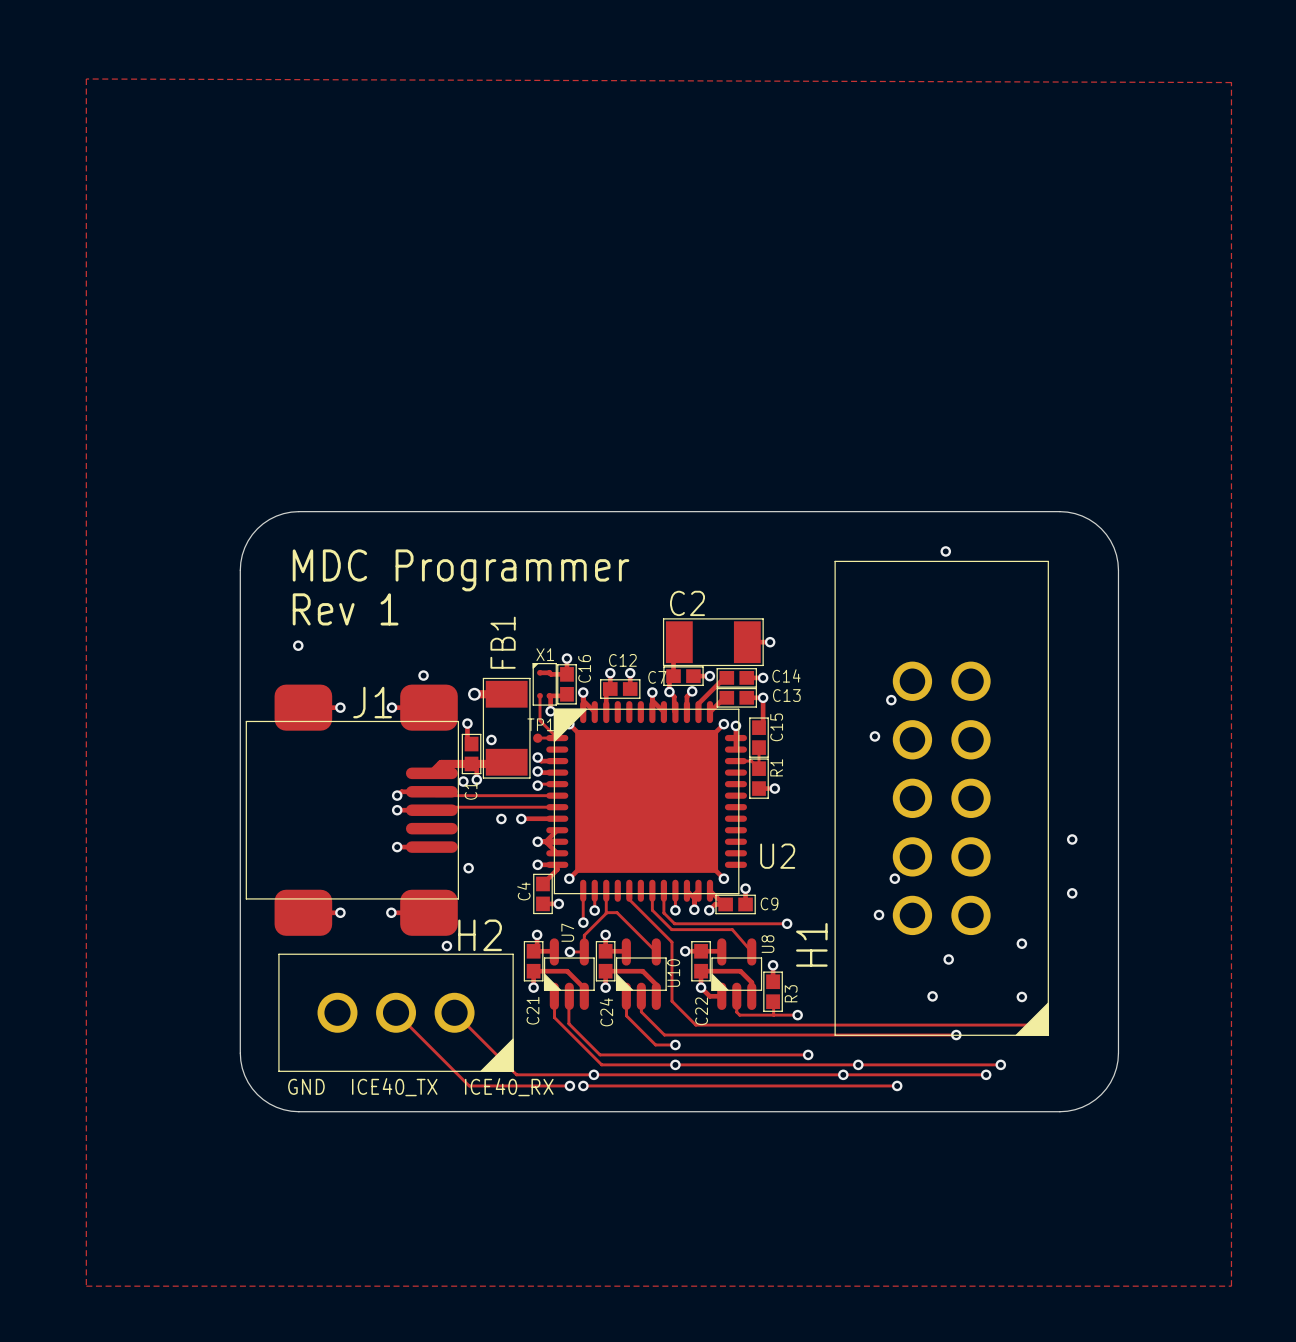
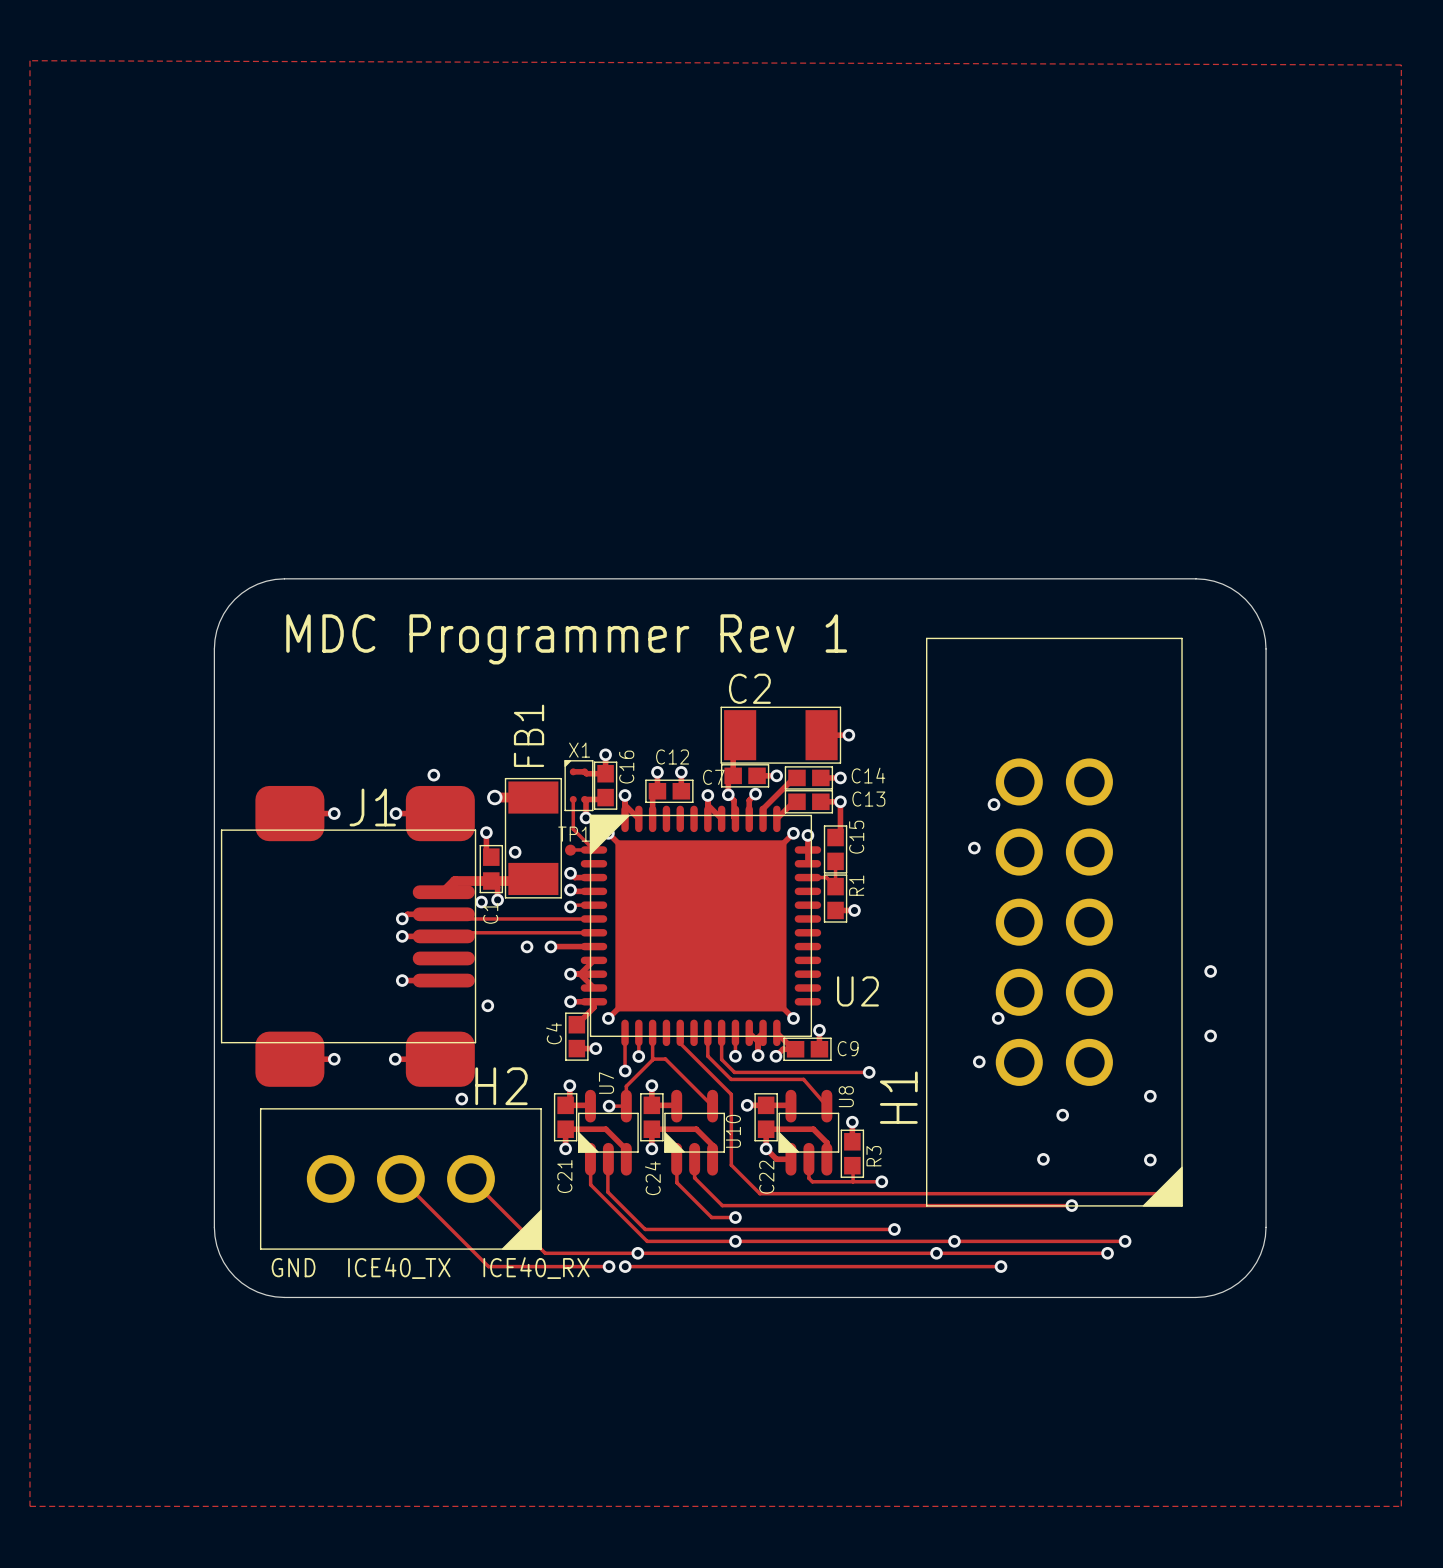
via: (945, 551) -> none
text: MDC Programmer (461, 570) -> MDC Programmer Rev 1 (566, 639)
text: Rev 1 (345, 609) -> none
via: (298, 645) -> none

